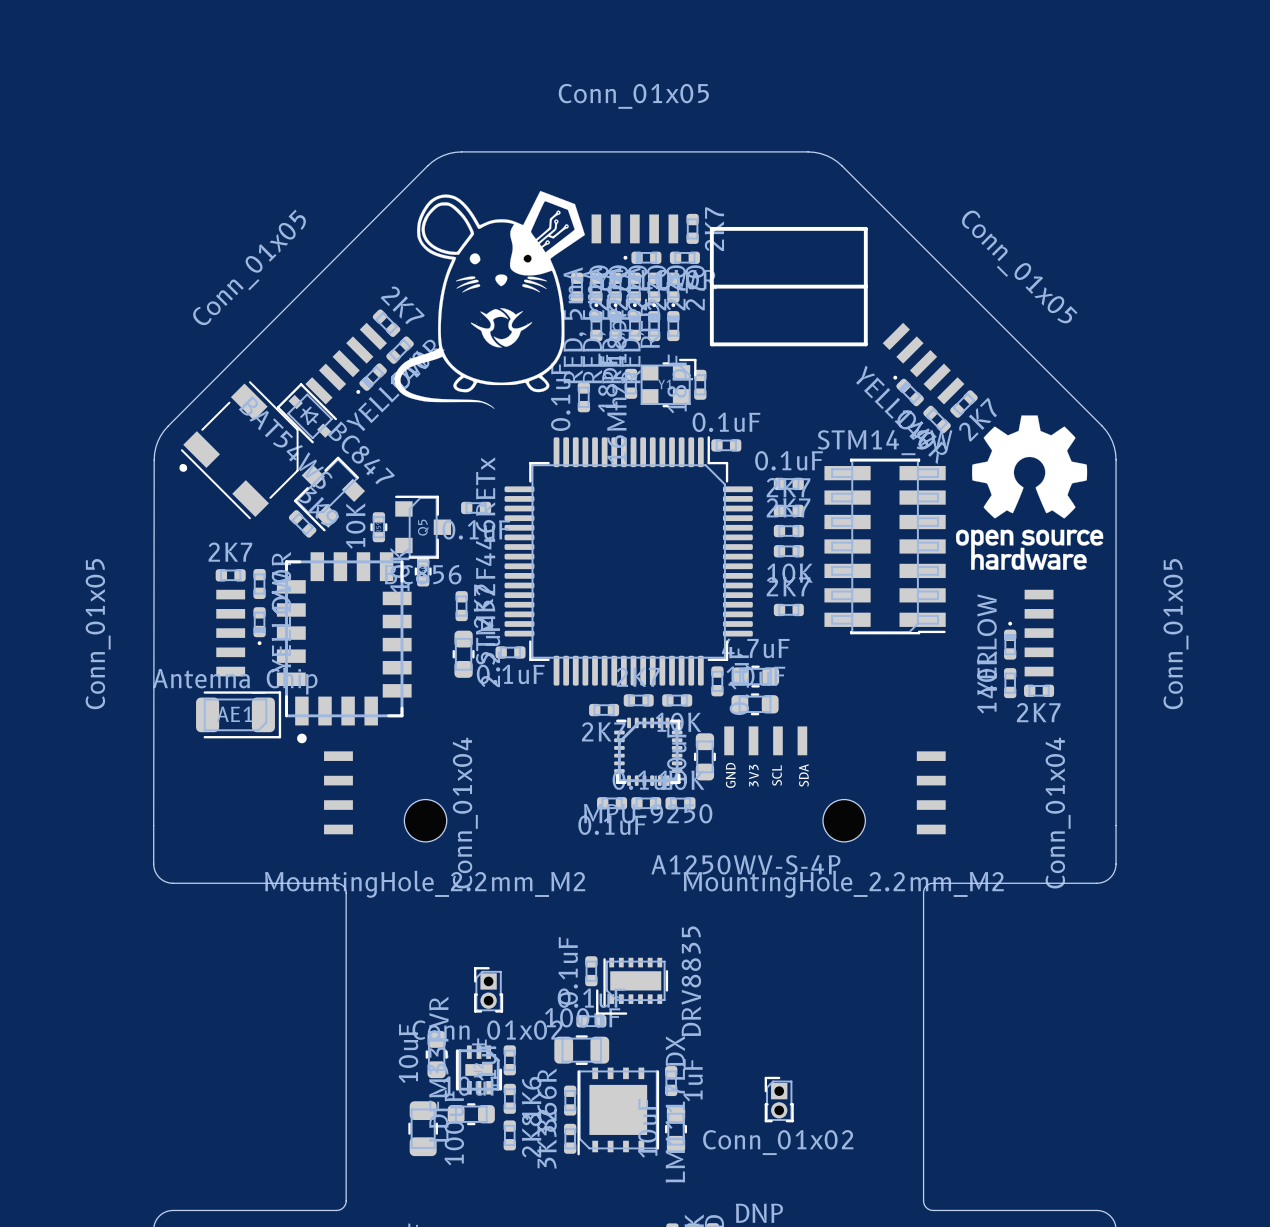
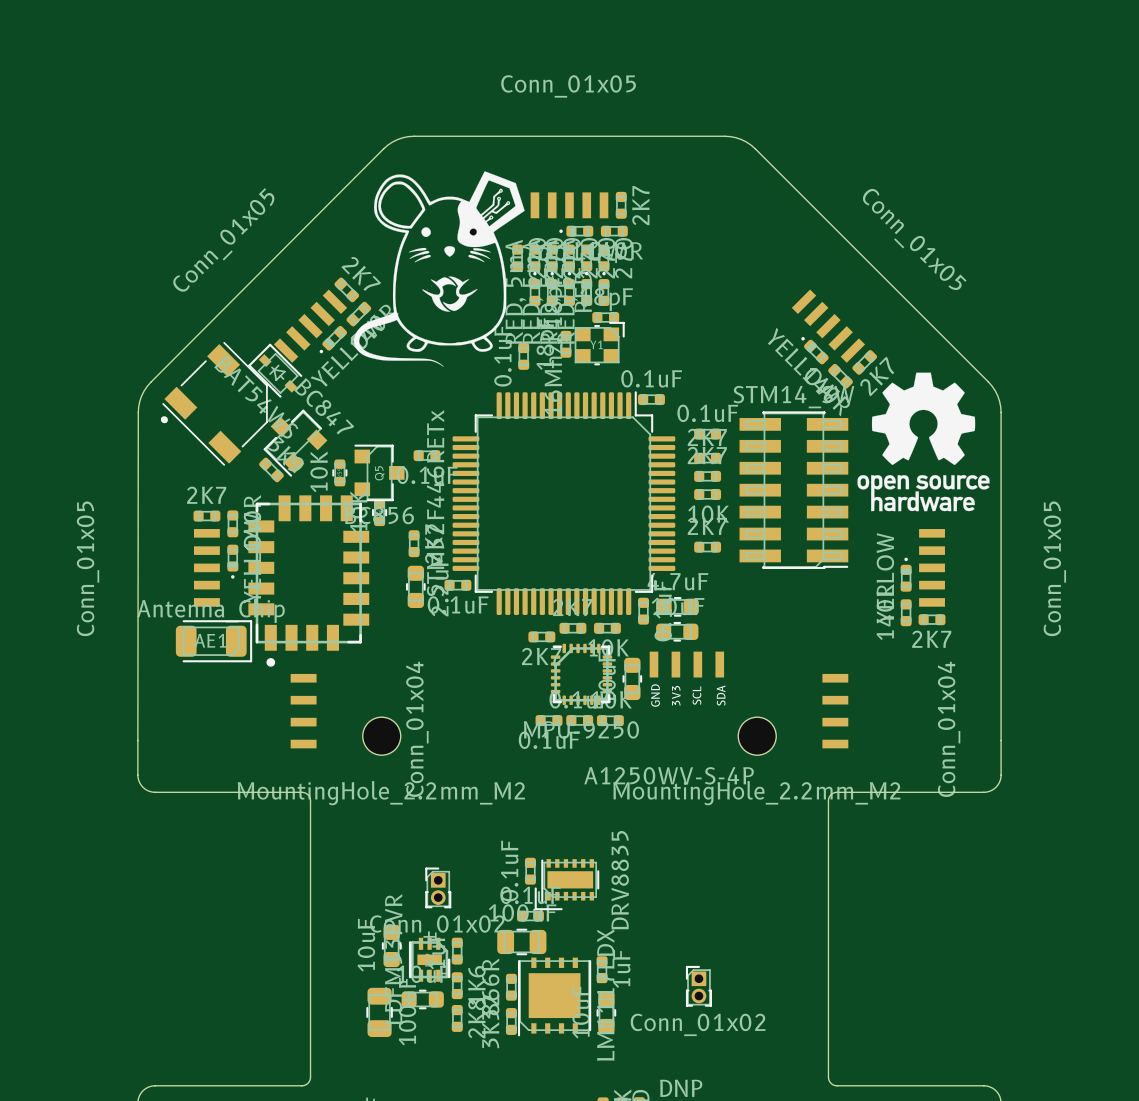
line: (711, 228) (711, 344) (865, 344) (865, 228) (711, 228) -> none
line: (711, 286) (865, 286) -> none
part rotation: 0° (700, 384) -> 90° clockwise (605, 317)
part position: (700, 384) -> (605, 317)

